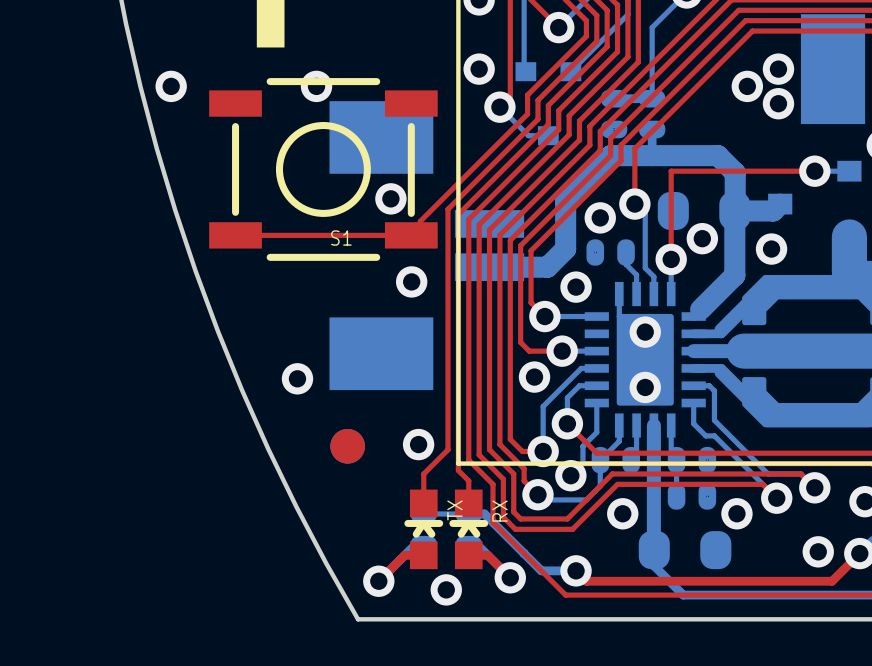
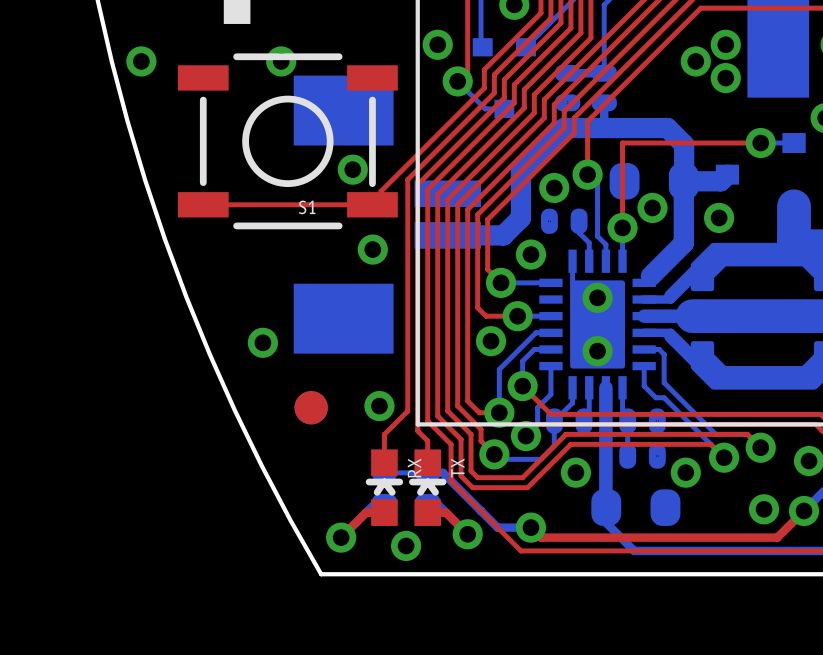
TX name: TX (454, 510) -> RX (414, 468)
RX name: RX (499, 511) -> TX (457, 468)

